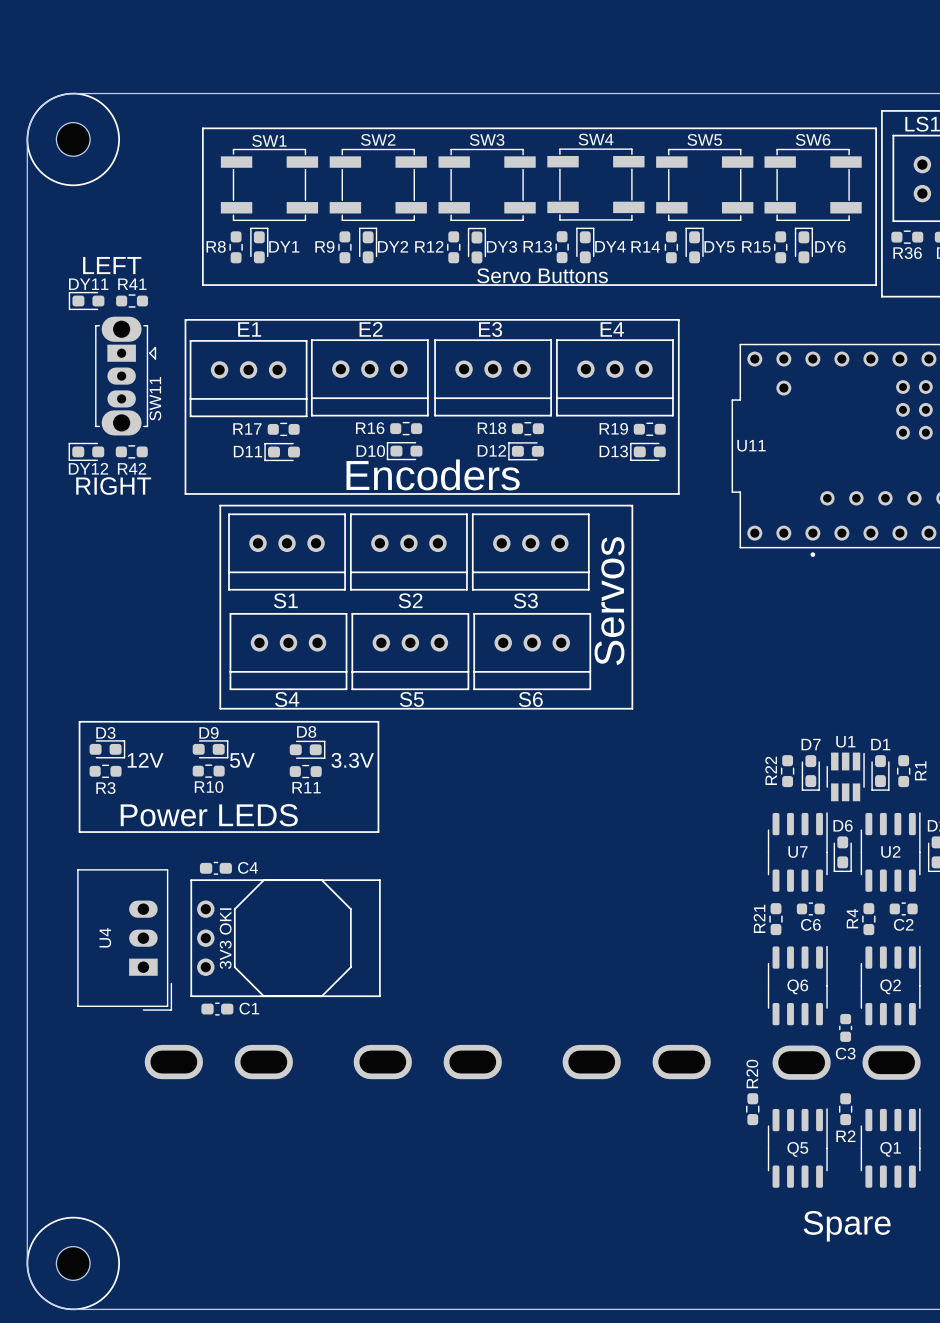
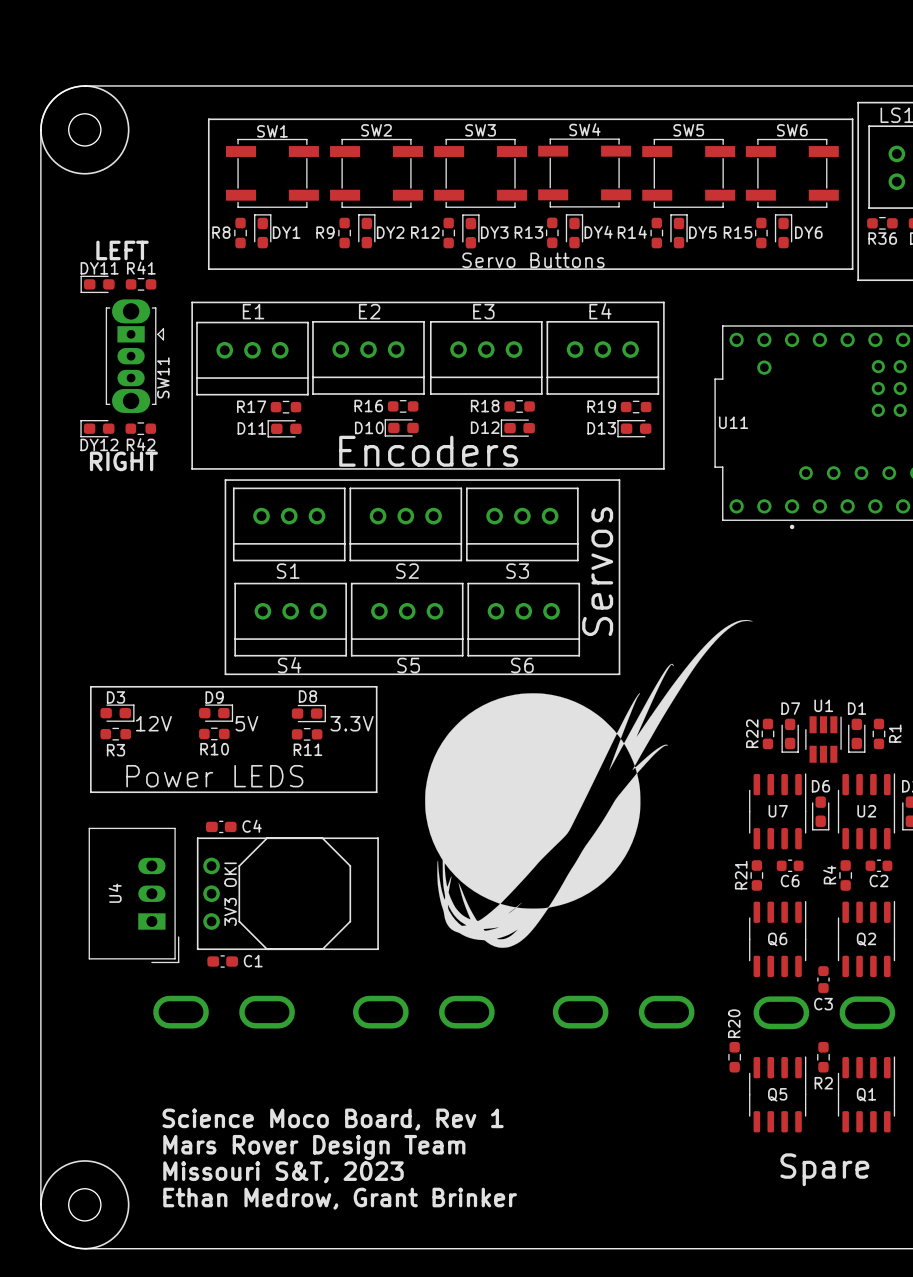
drawing: none -> [425, 619, 753, 948]
text: none -> Science Moco Board, Rev 1 (333, 1119)
text: none -> Mars Rover Design Team (314, 1147)
text: none -> Missouri S&T, 2023 (283, 1172)
text: none -> Ethan Medrow, Grant Brinker (340, 1198)

